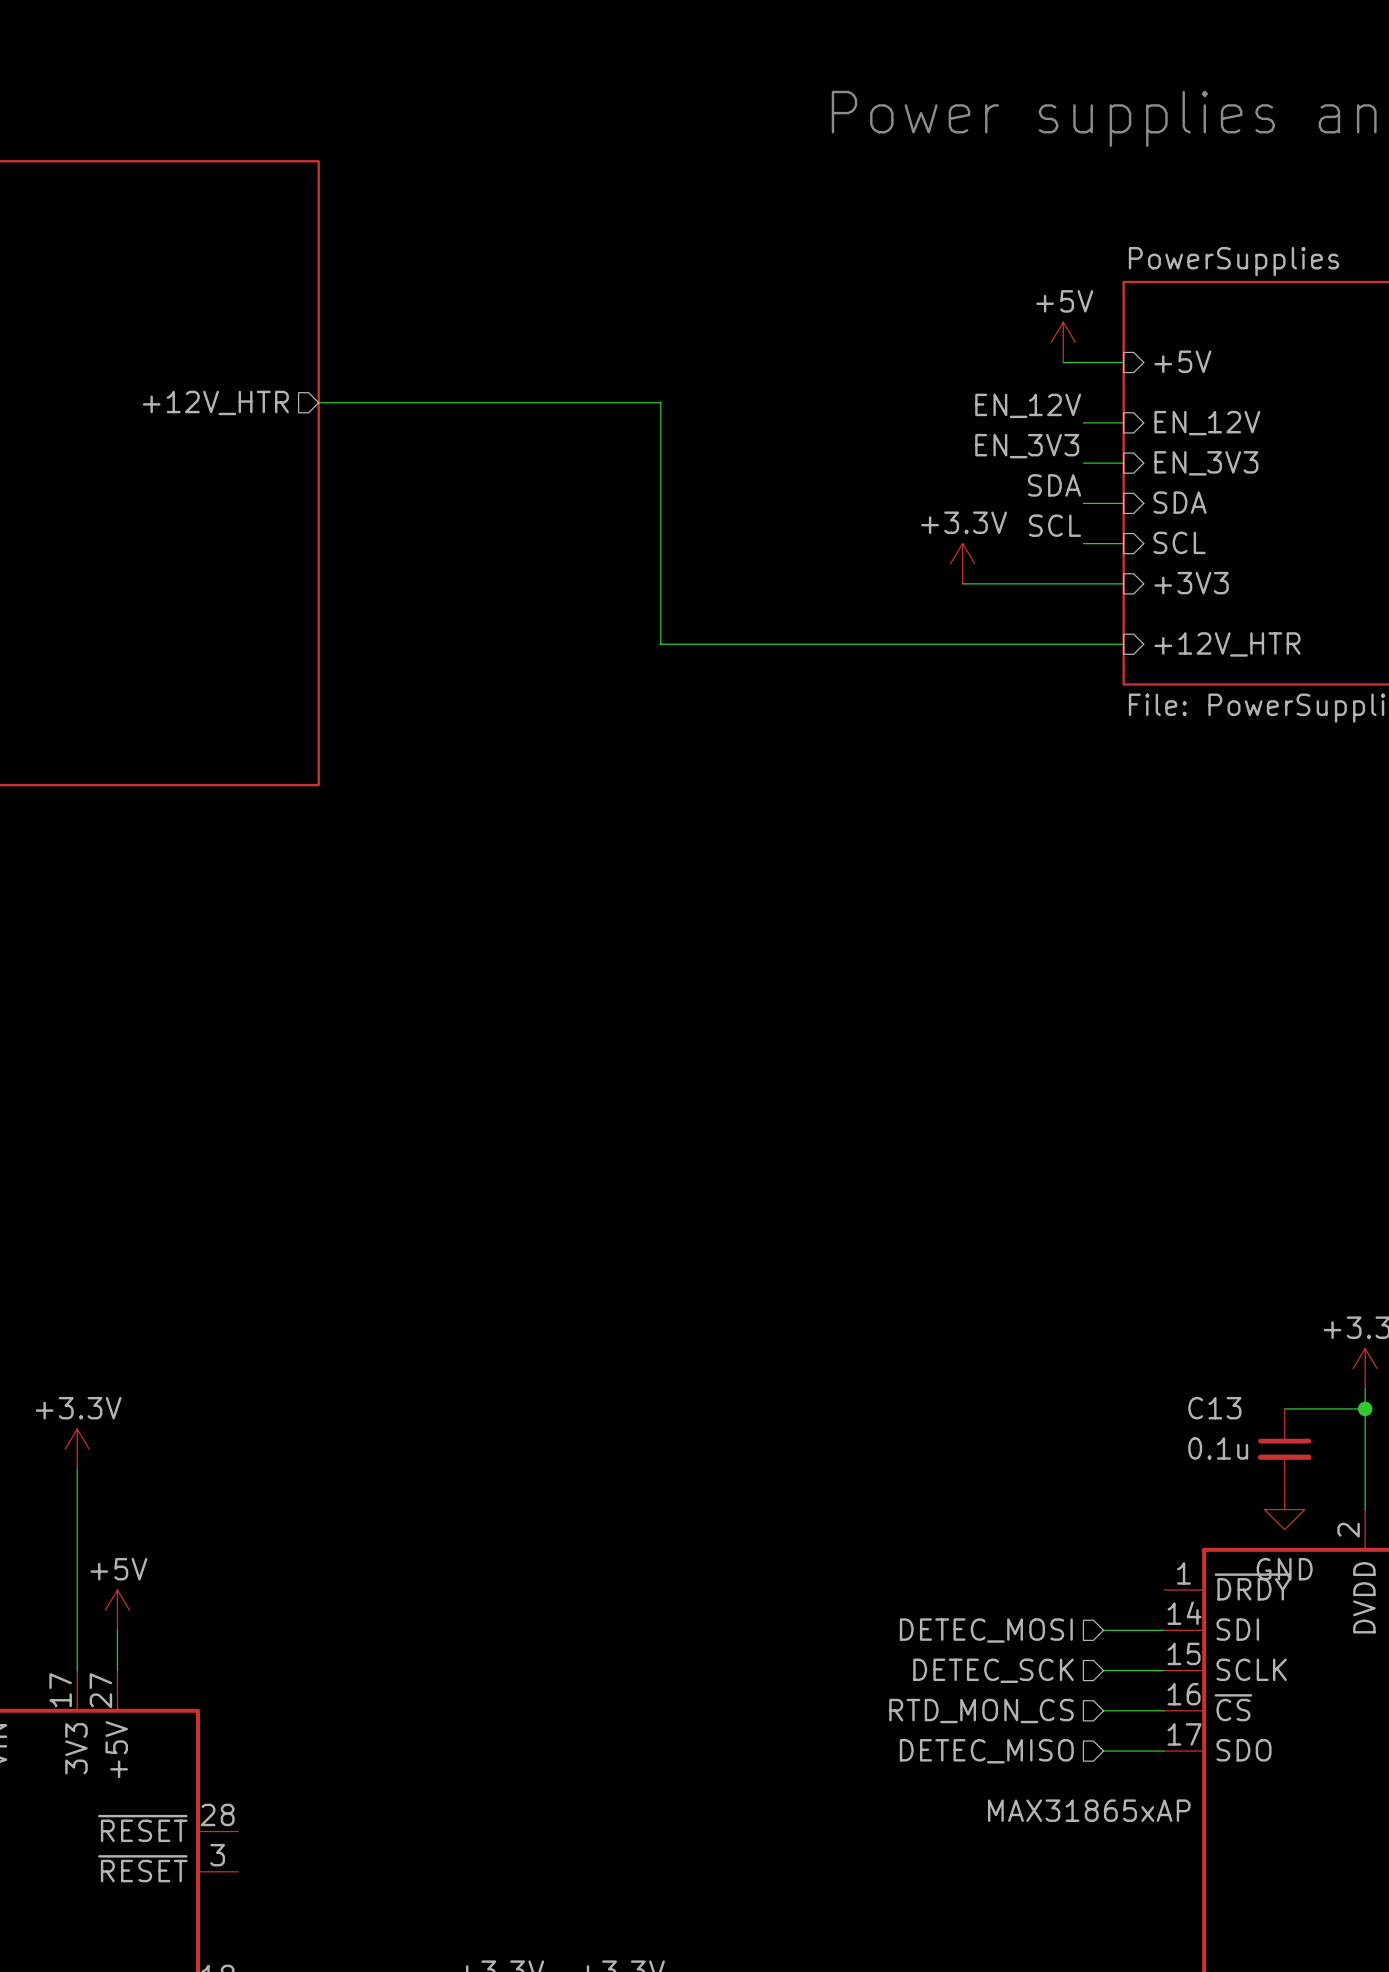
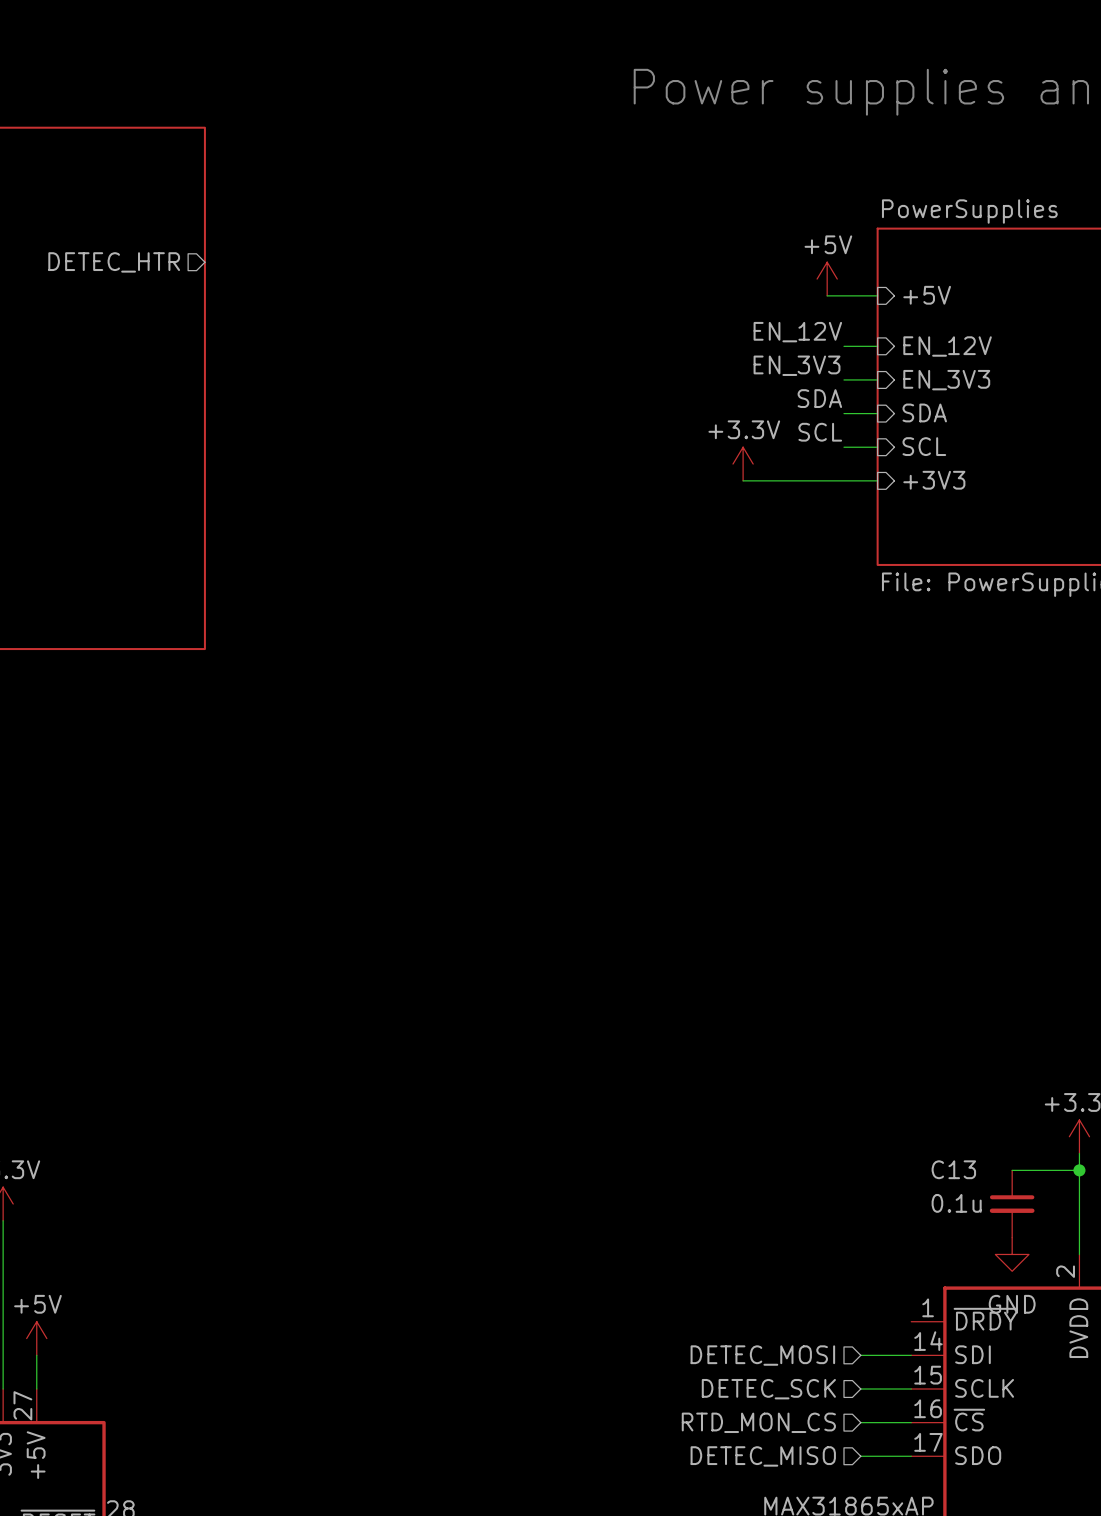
sheet pin: none -> DETEC_HTR (114, 262)
sheet pin: +12V_HTR (215, 402) -> none
wire: (318, 402) (660, 402) (660, 644) (1123, 644) -> none
sheet pin: +12V_HTR (1227, 644) -> none

